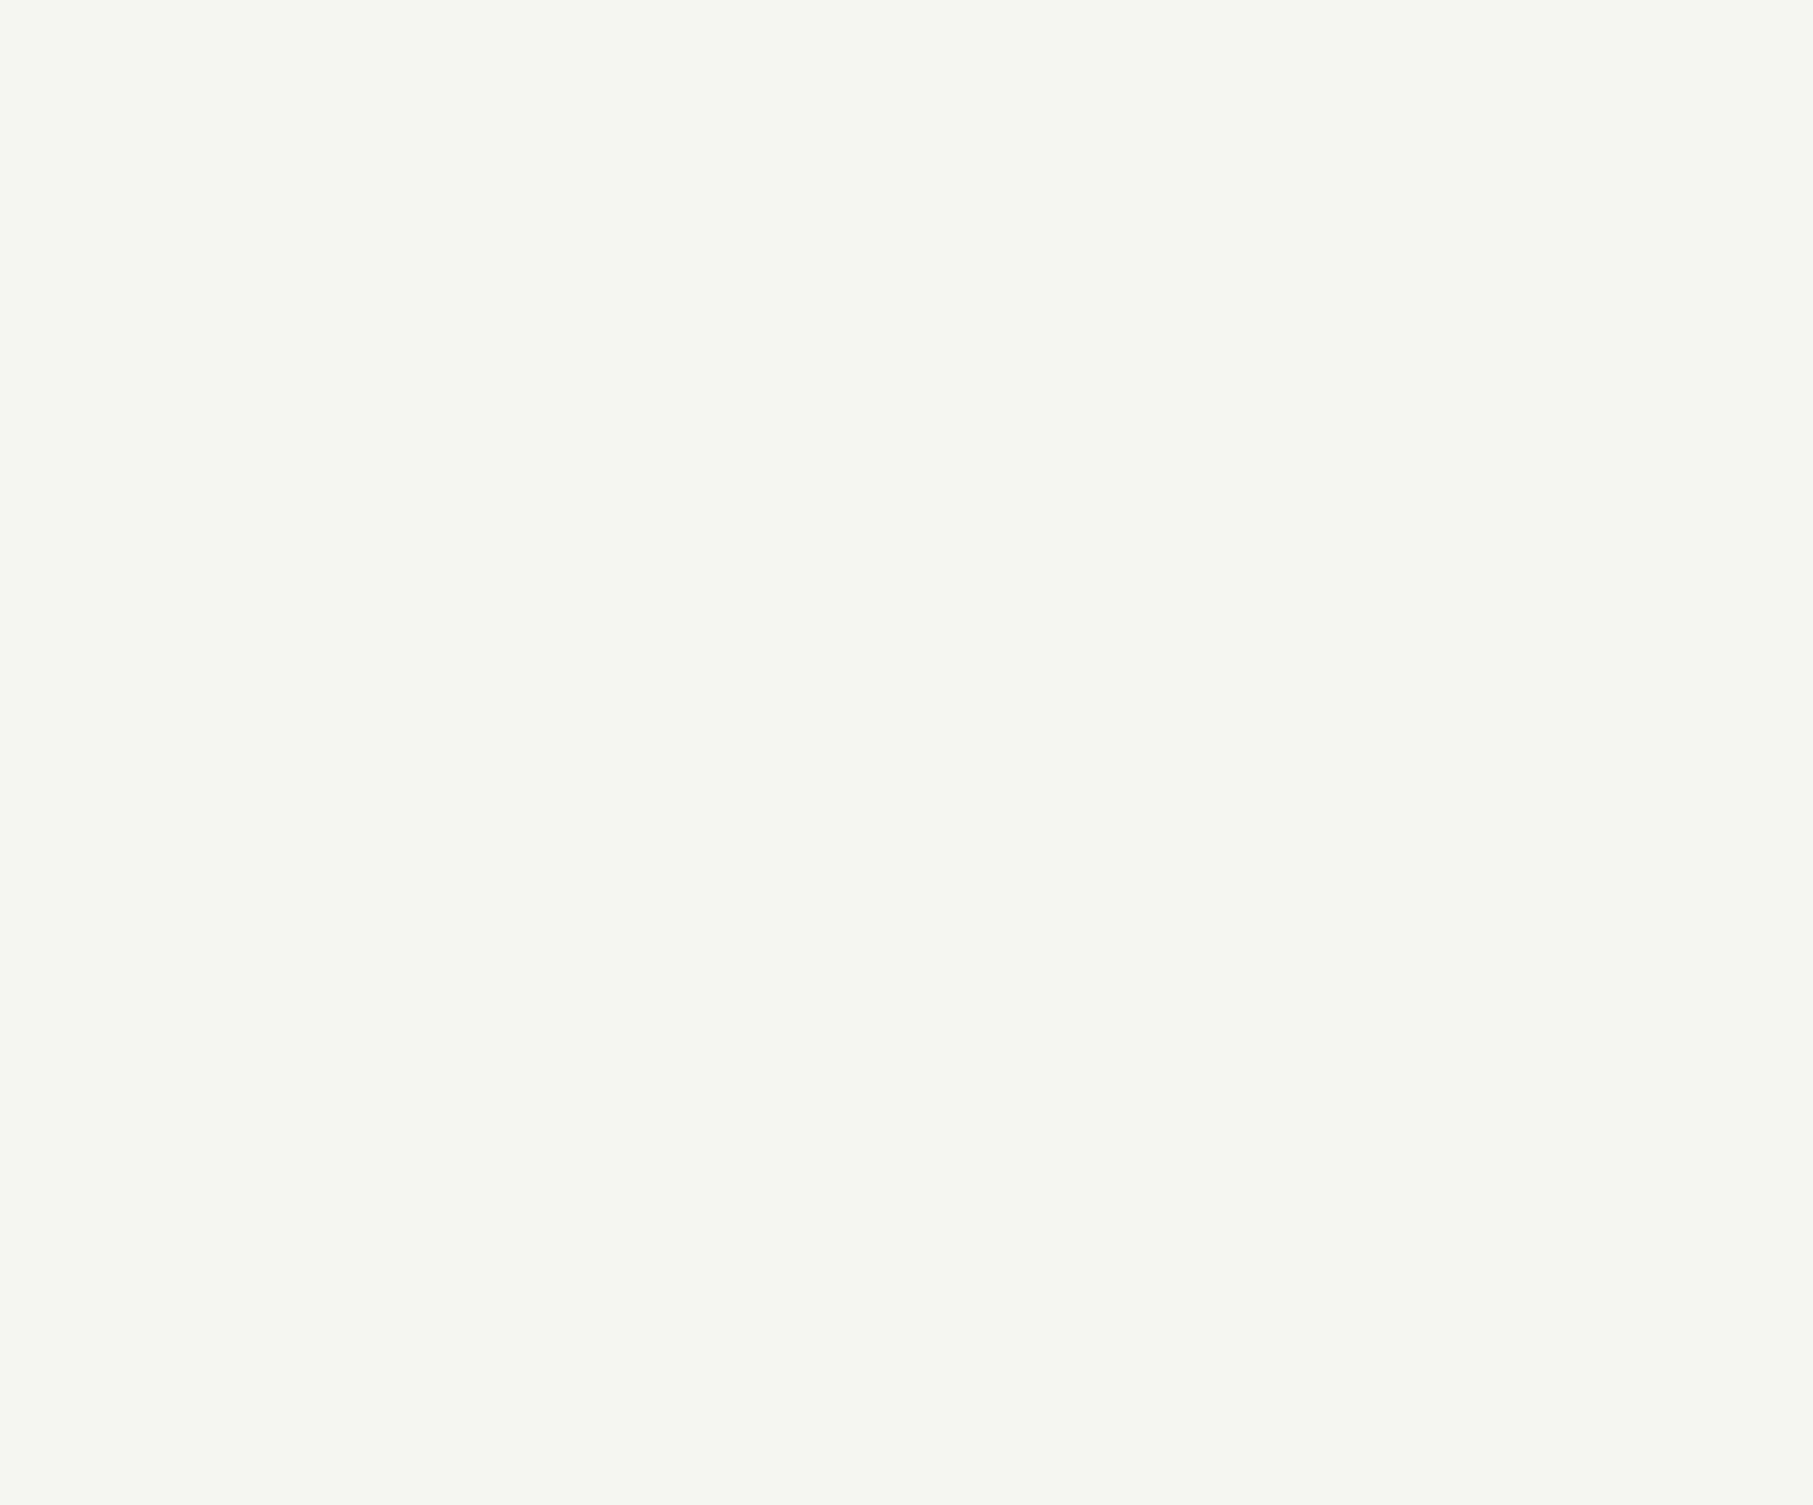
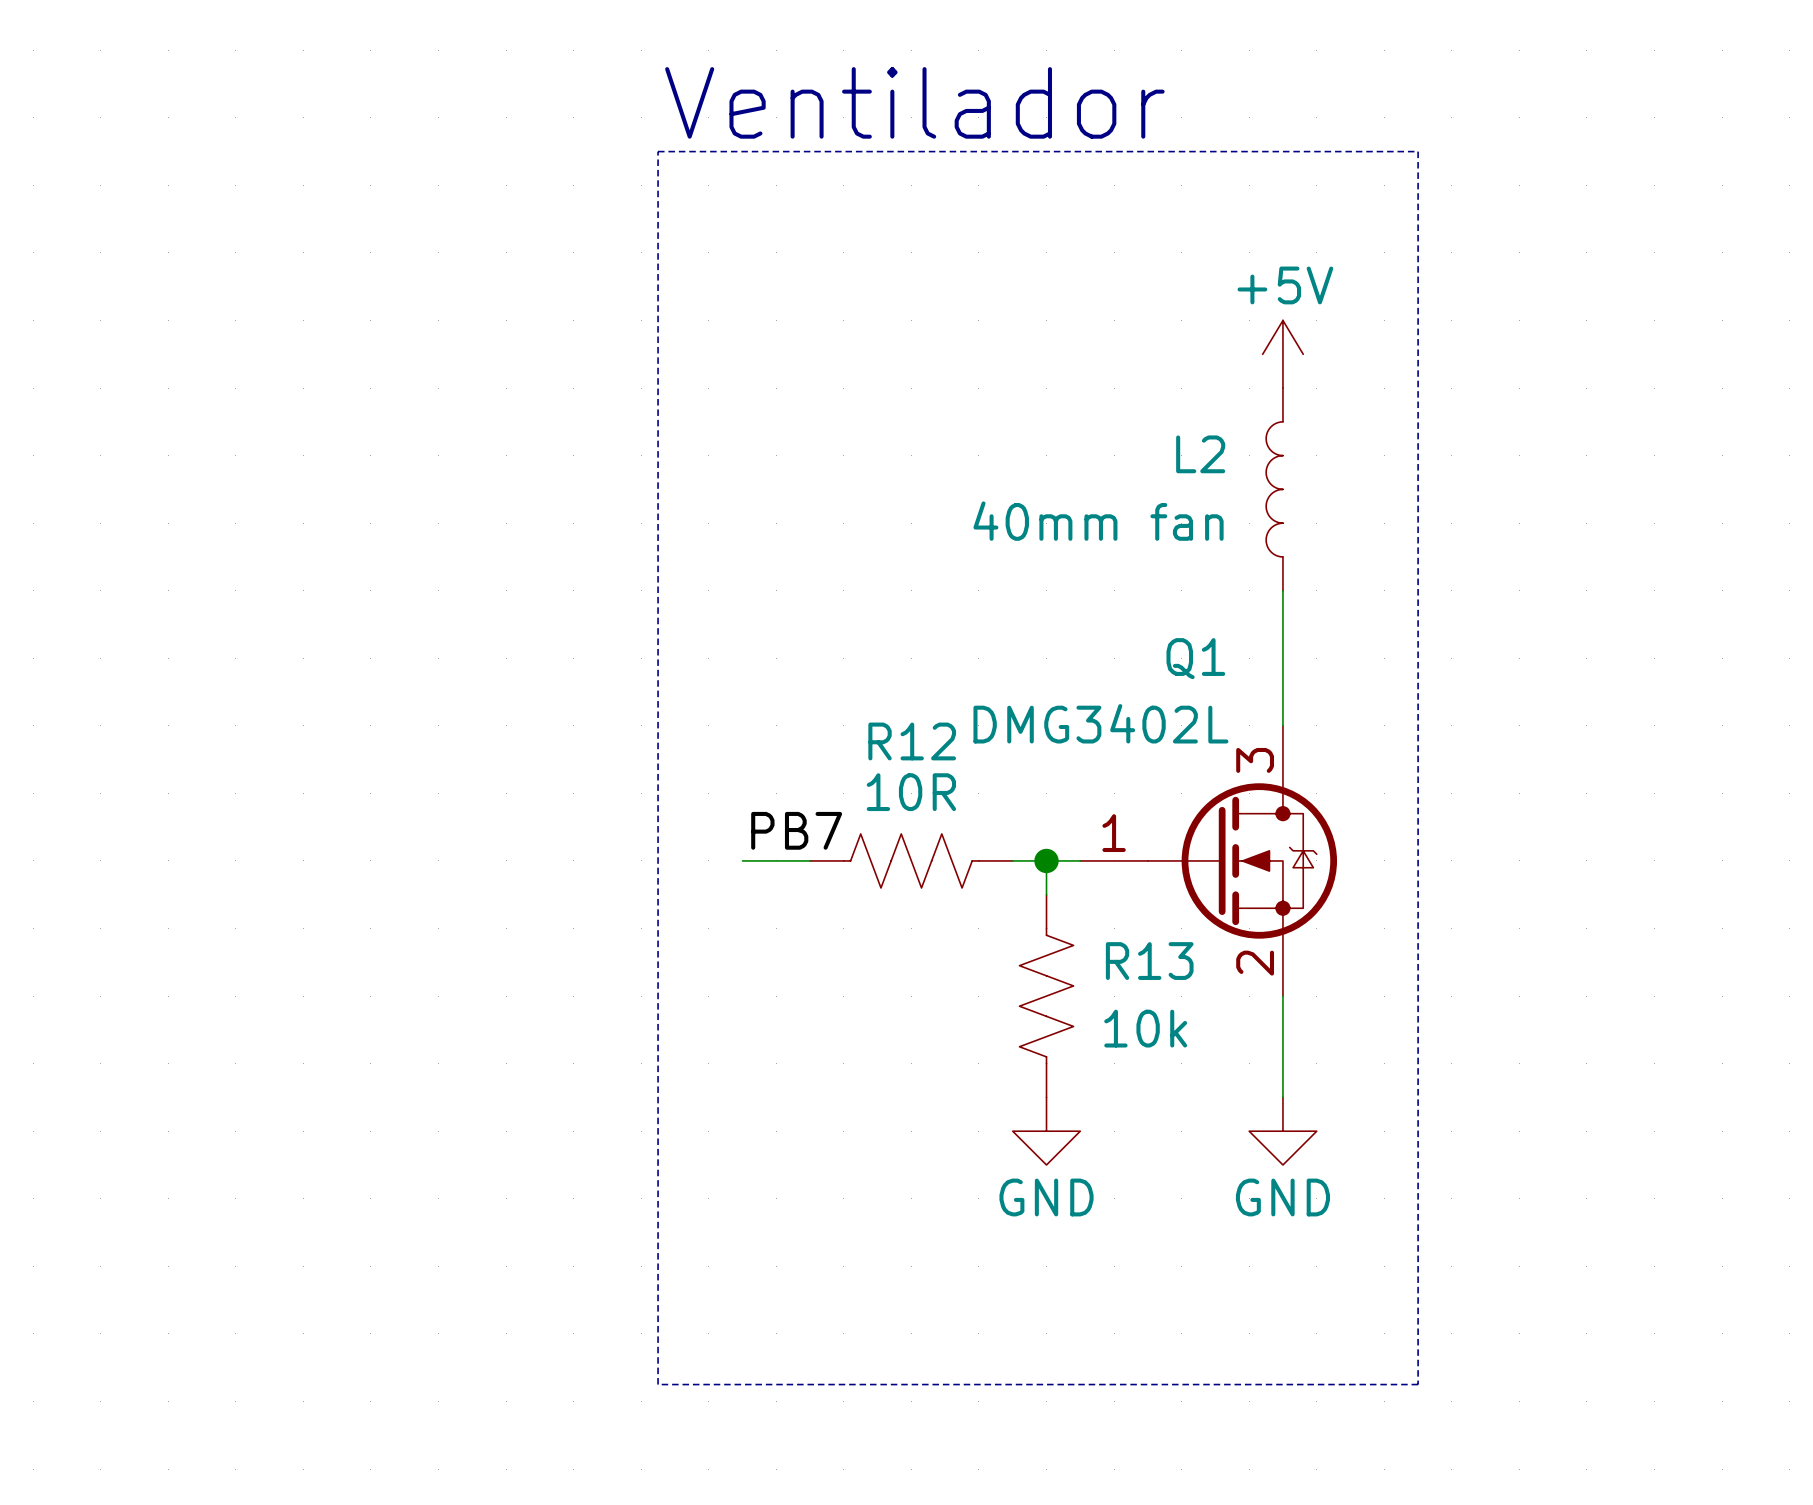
text: none -> Ventilador (914, 102)
line: none -> (658, 151) (1418, 151) (1418, 1384) (658, 1384) (658, 151)
power symbol: none -> +5V (1282, 354)
L2: none -> 40mm fan (1274, 489)
wire: none -> (1282, 590) (1282, 725)
label: none -> PB7 (796, 830)
wire: none -> (742, 860) (810, 860)
R12: none -> 10R (911, 860)
wire: none -> (1012, 860) (1080, 860)
wire: none -> (1046, 860) (1046, 894)
junction: none -> (1046, 860)
Q1: none -> DMG3402L (1208, 860)
R13: none -> 10k (1046, 996)
wire: none -> (1282, 996) (1282, 1097)
power symbol: none -> GND (1046, 1131)
power symbol: none -> GND (1282, 1131)

